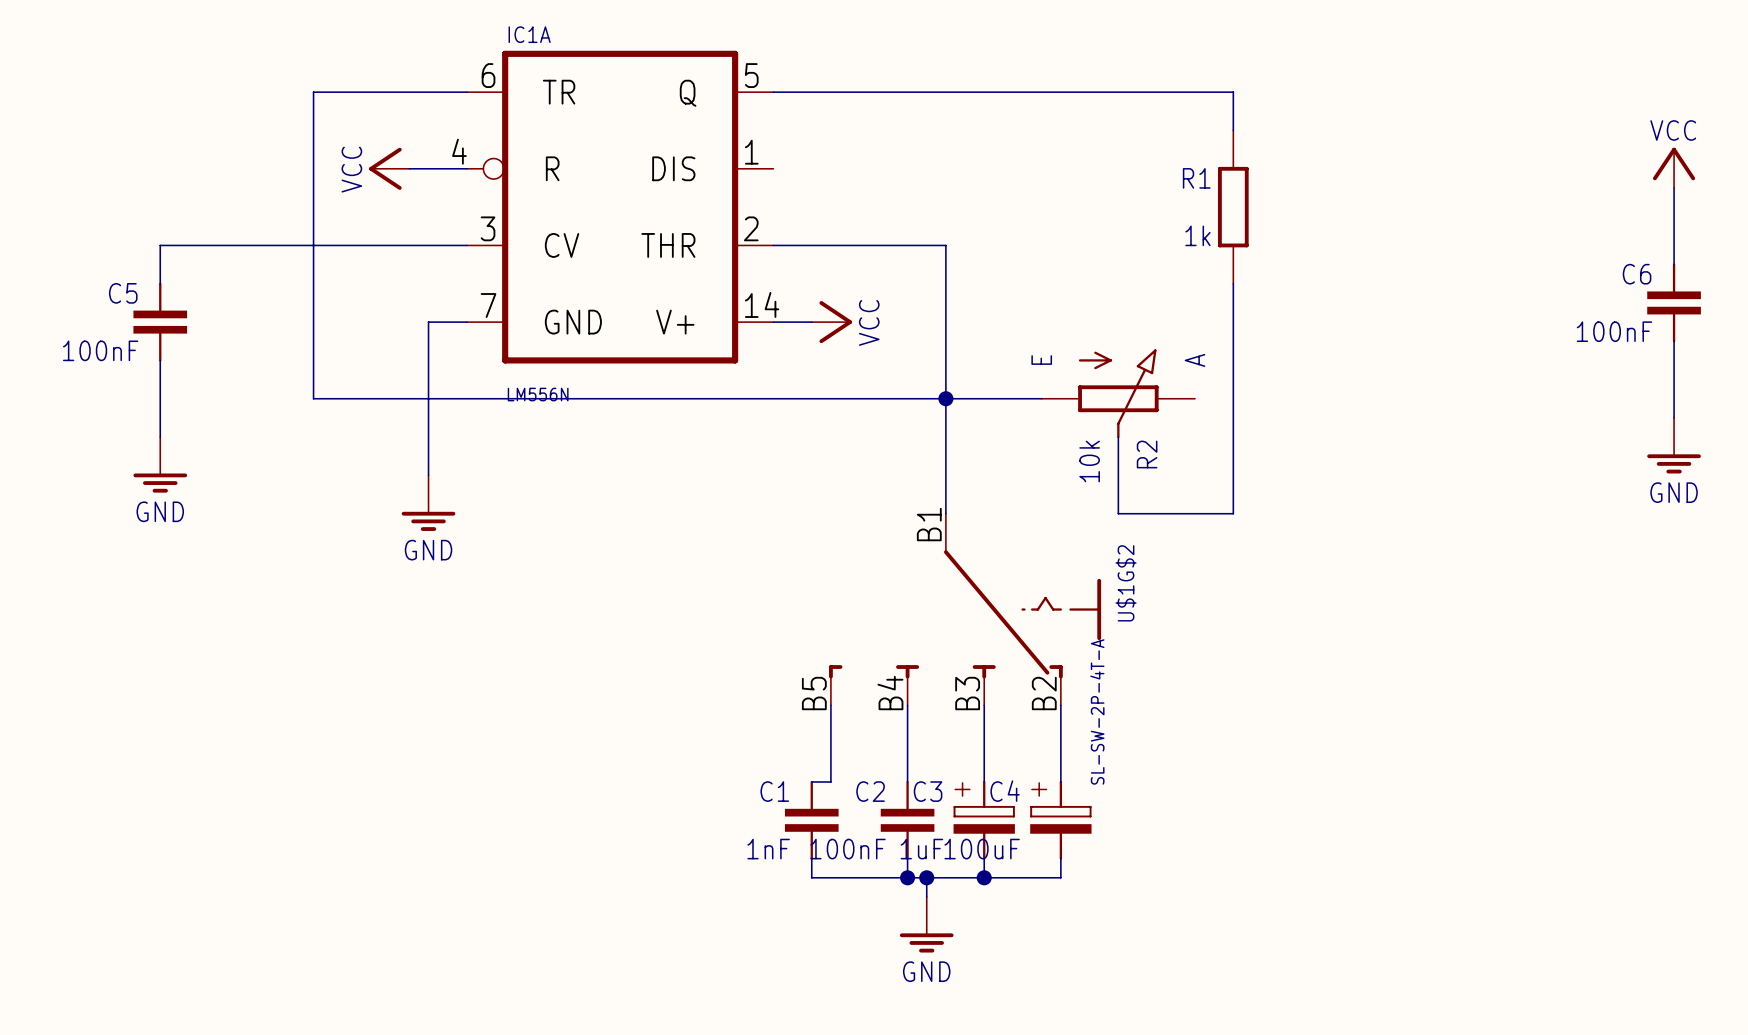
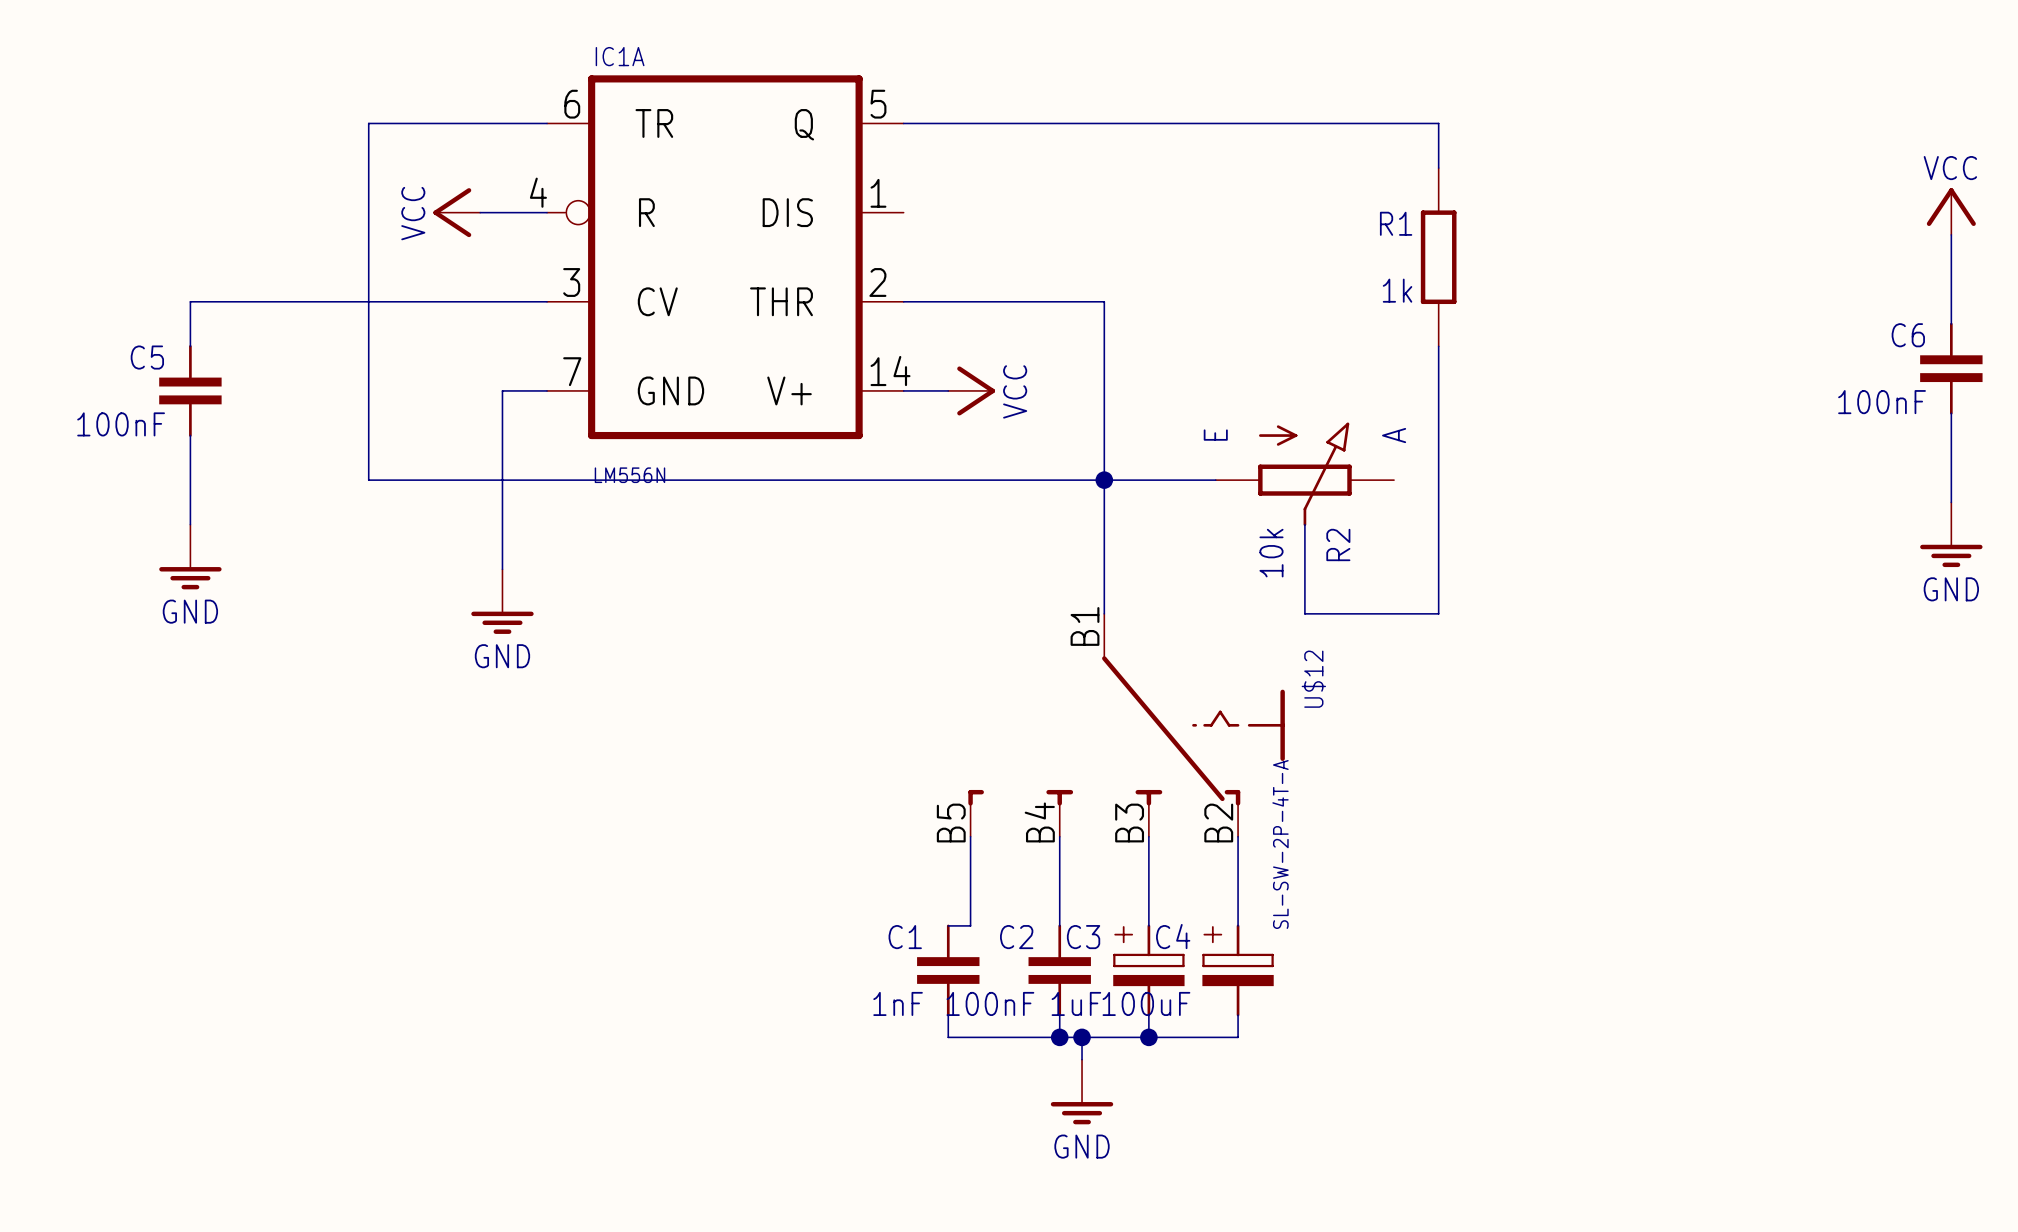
U$1G$2 name: U$1G$2 (1126, 583) -> U$12 (1313, 679)

